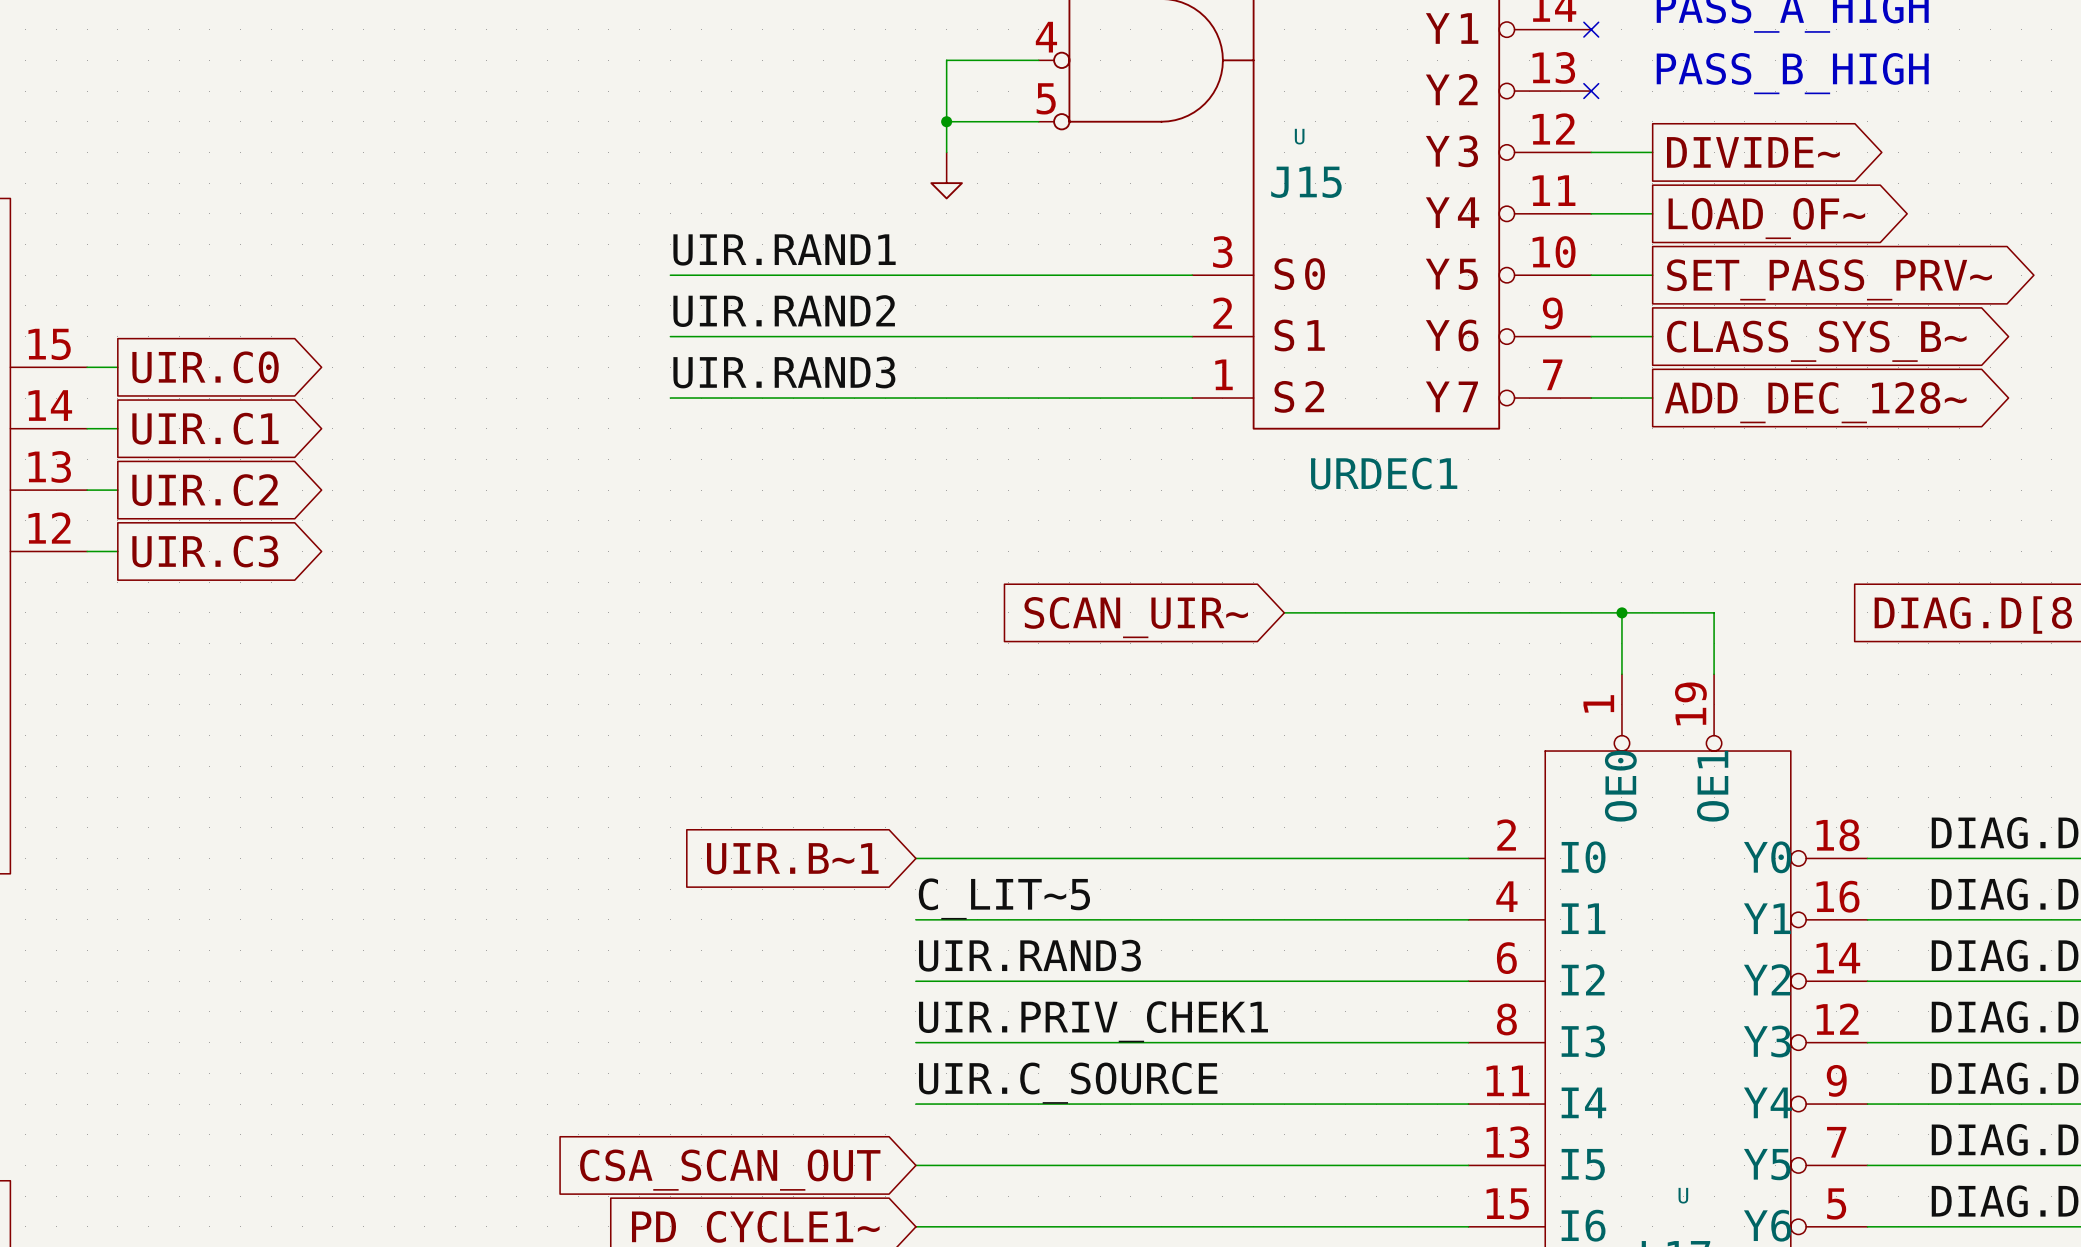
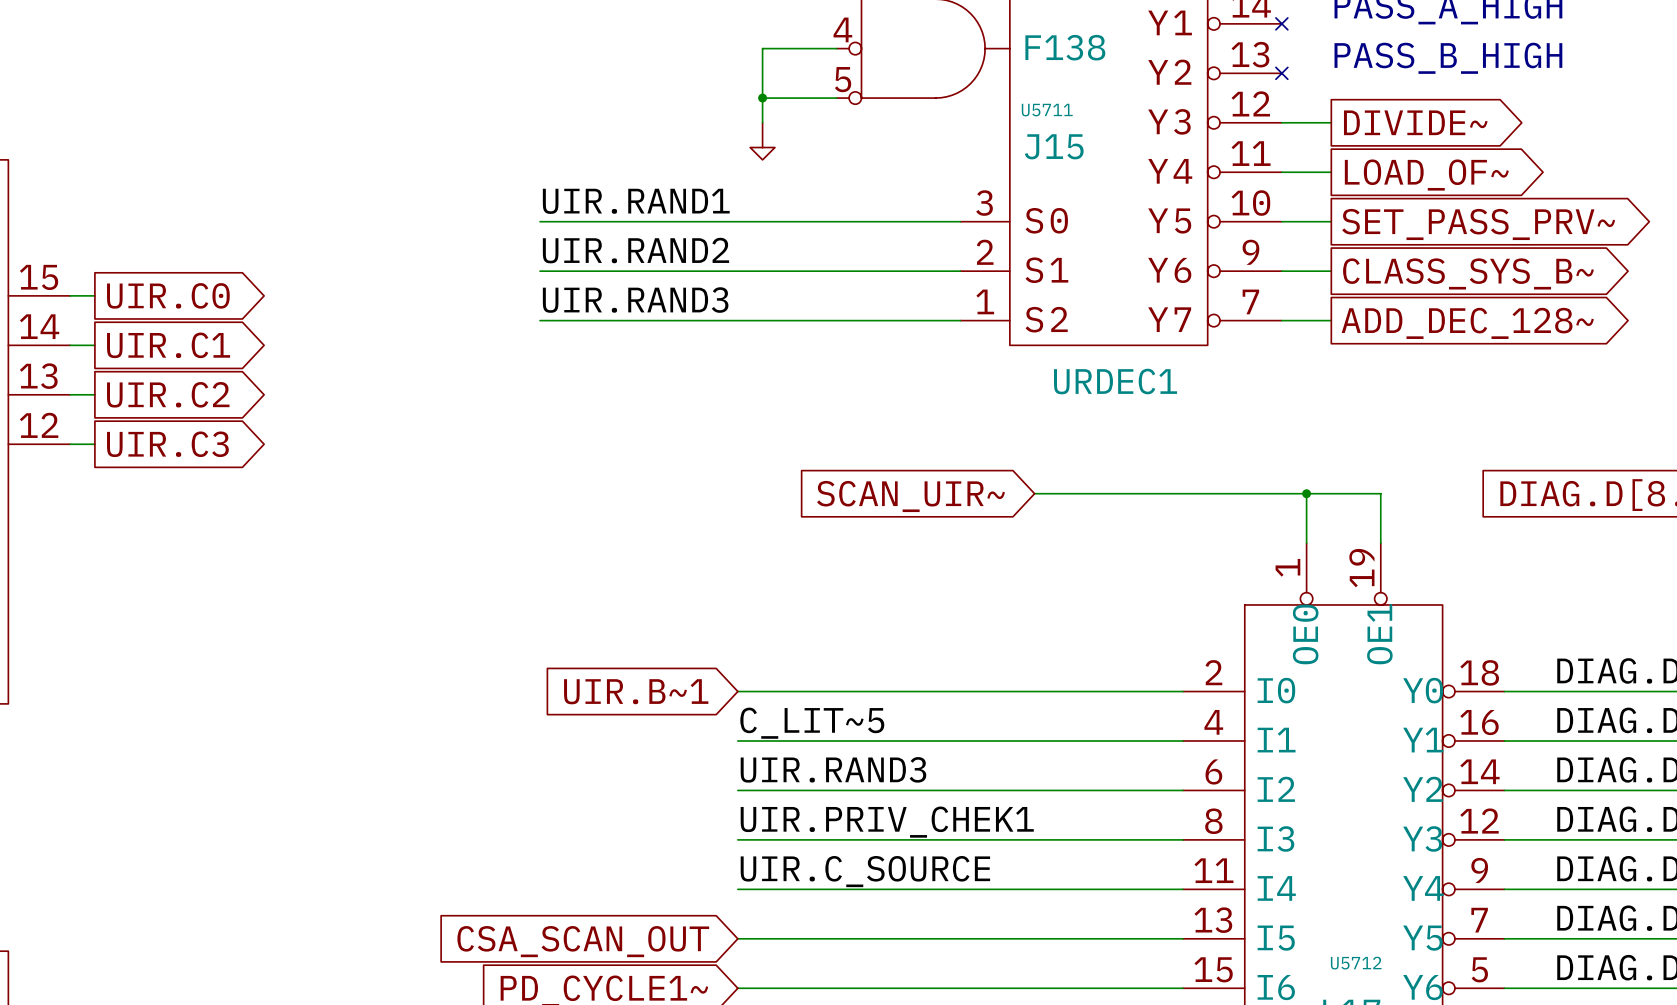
U value: none -> F138 (1065, 47)
U name: U (1299, 136) -> U5711 (1047, 110)
U name: U (1683, 1195) -> U5712 (1356, 963)

